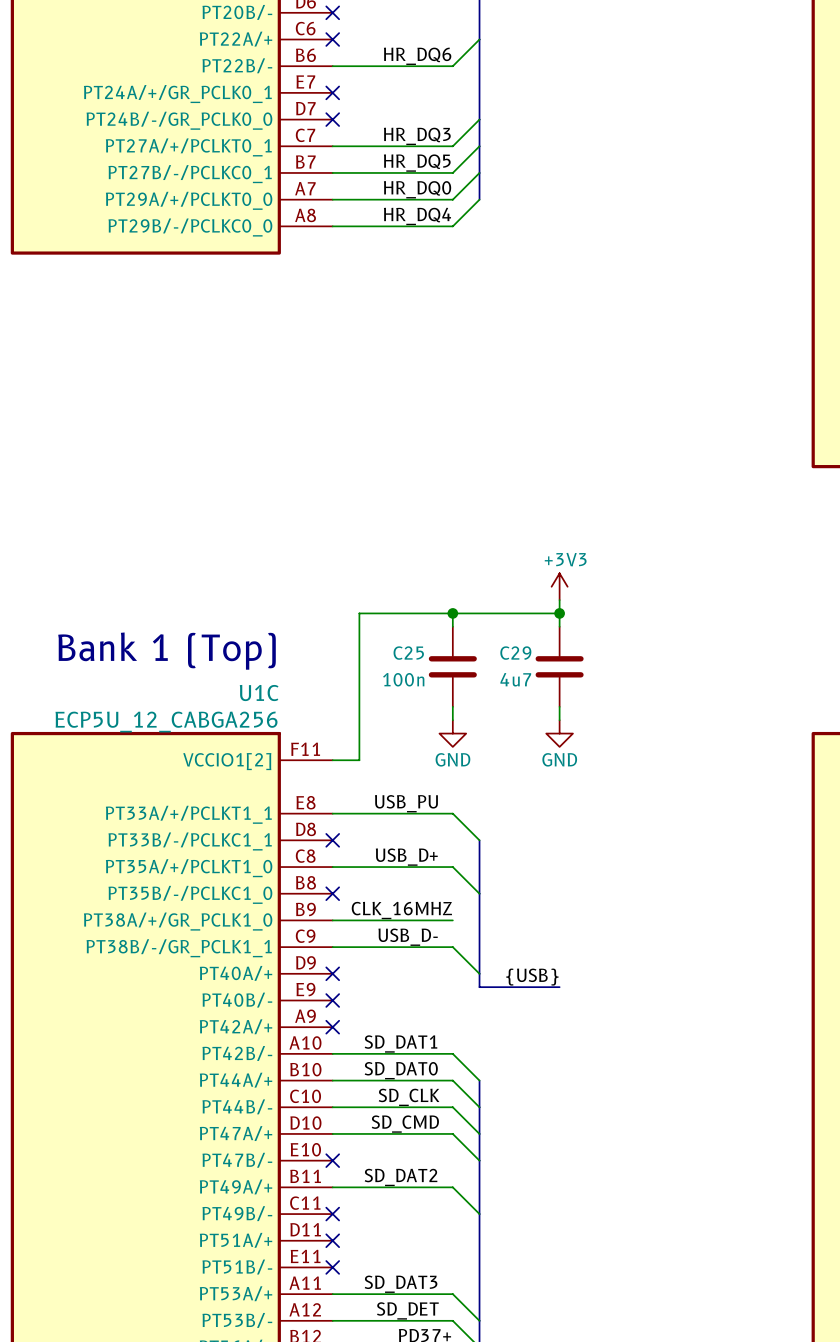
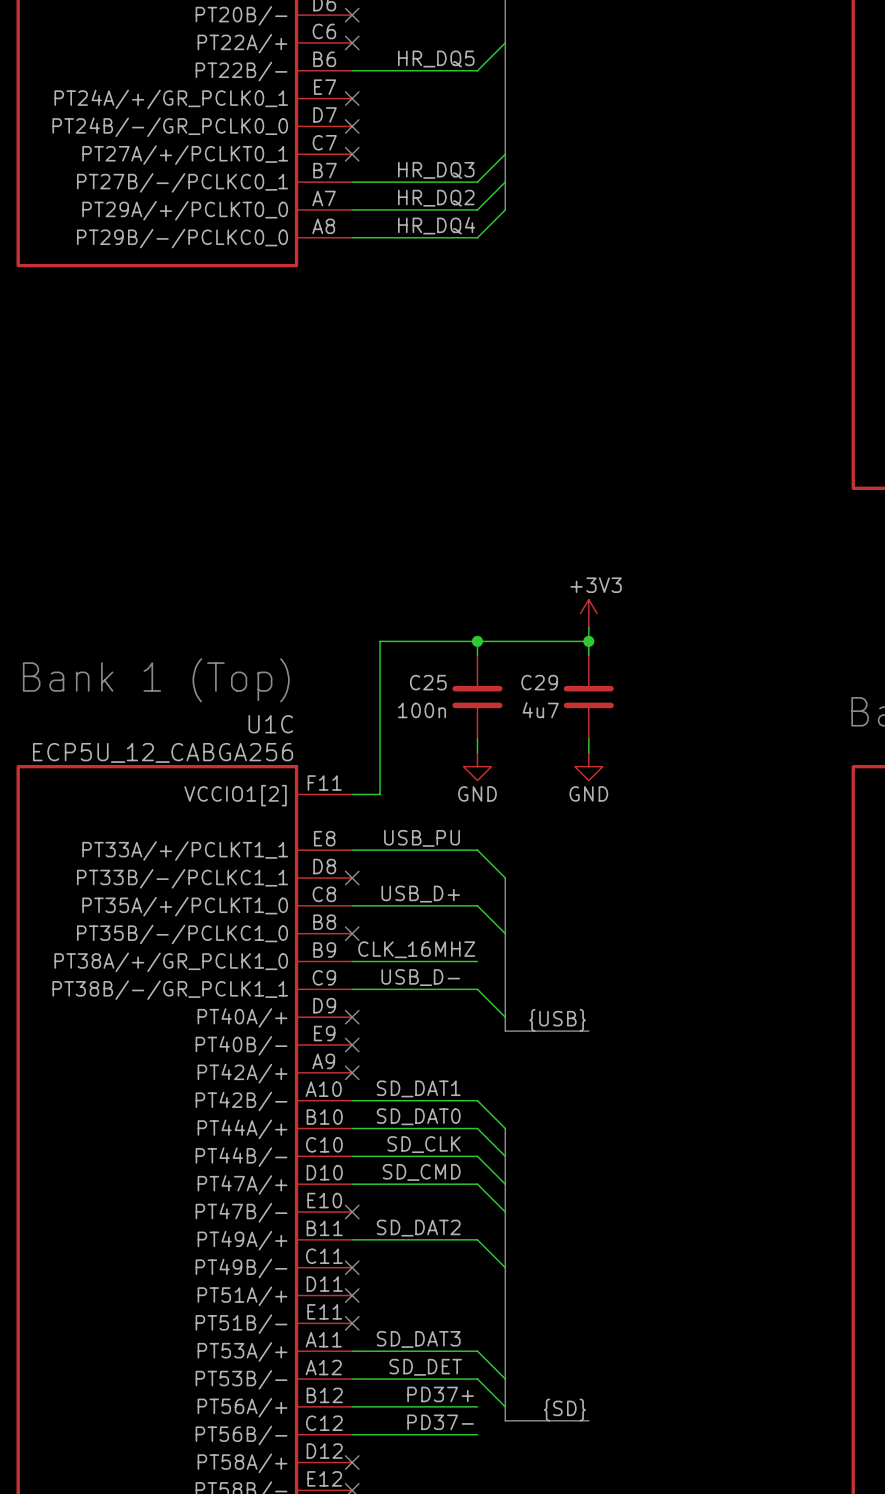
label: HR_DQ6 (417, 56) -> HR_DQ5 (436, 59)
wire: (479, 119) (452, 146) (332, 146) -> none
label: HR_DQ3 (417, 136) -> none
no-connect mark: none -> (352, 154)
label: HR_DQ5 (417, 163) -> HR_DQ3 (436, 170)
label: HR_DQ0 (417, 189) -> HR_DQ2 (436, 198)

